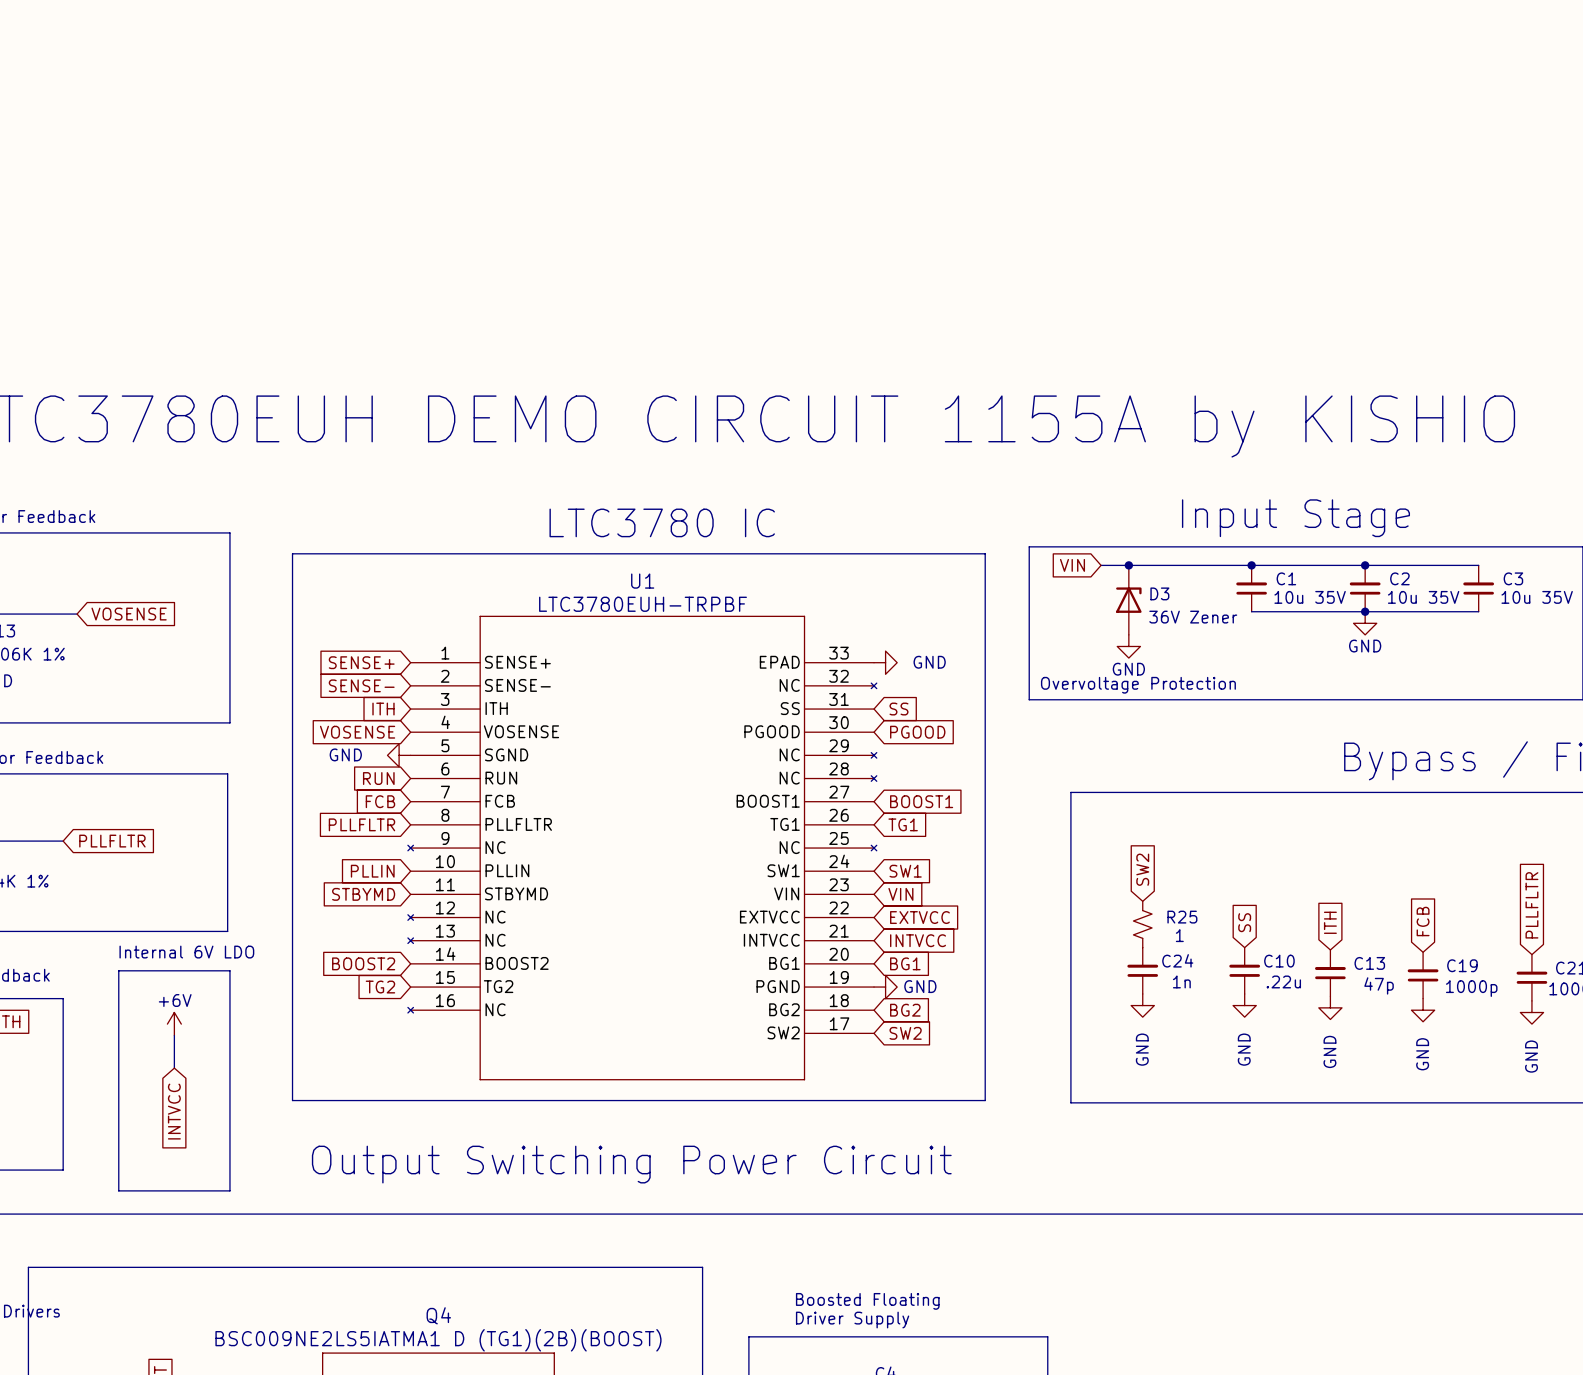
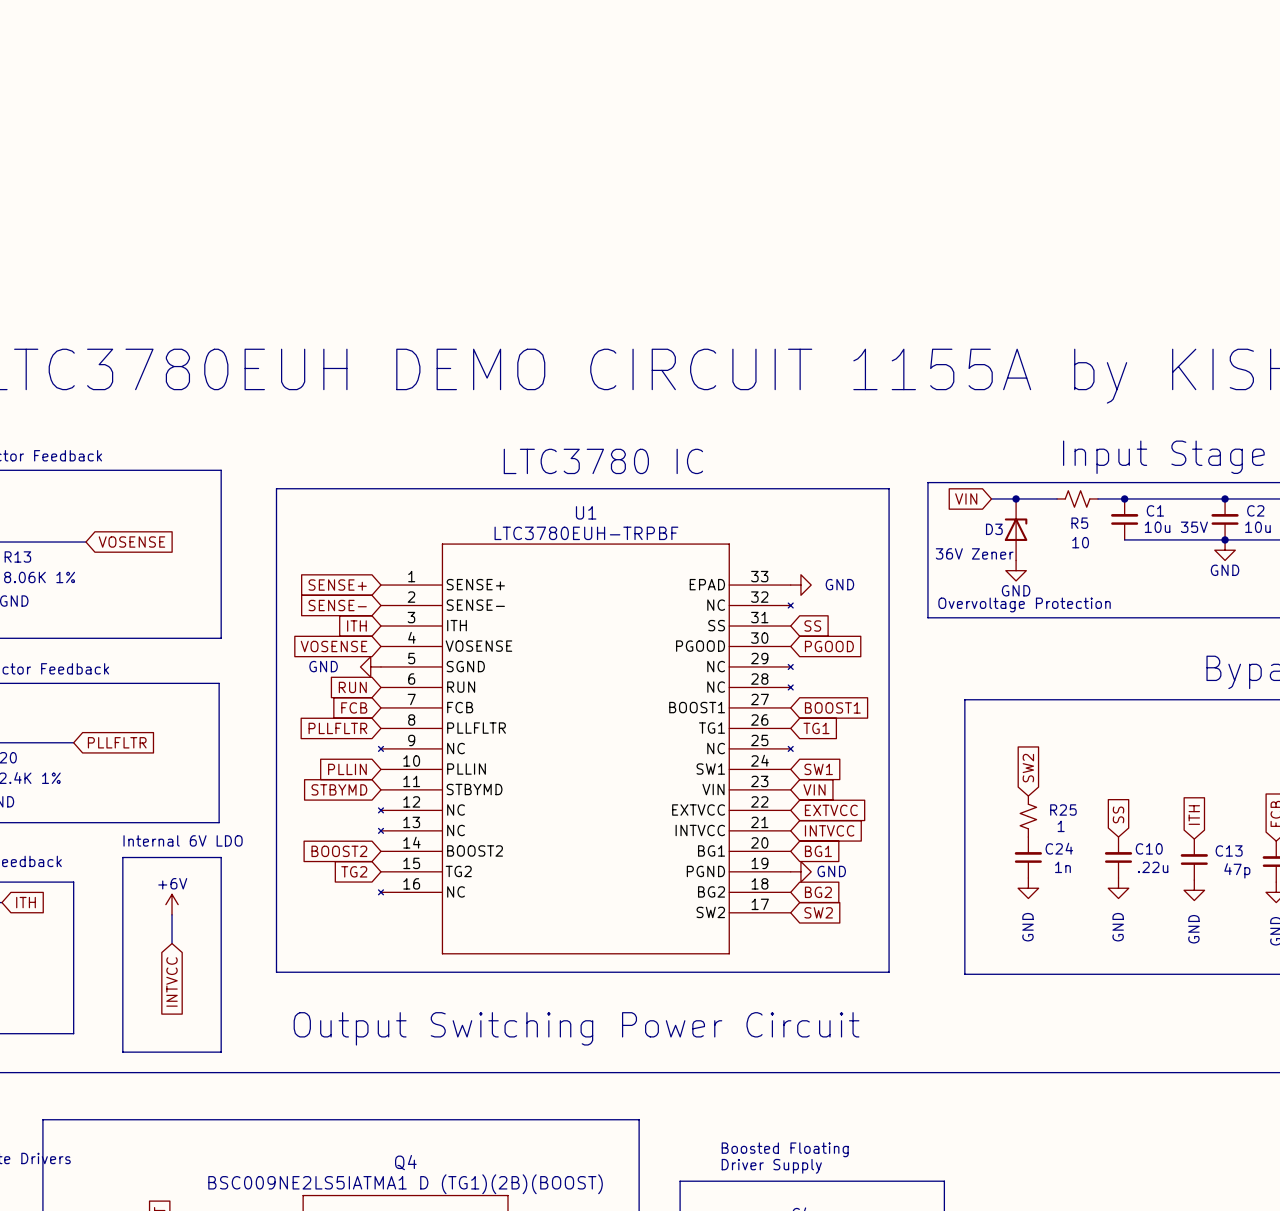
R5: none -> 10 (1077, 498)
D3 name position: D3 (1159, 593) -> D3 (994, 529)
D3 value position: 36V Zener (1193, 617) -> 36V Zener (974, 553)

